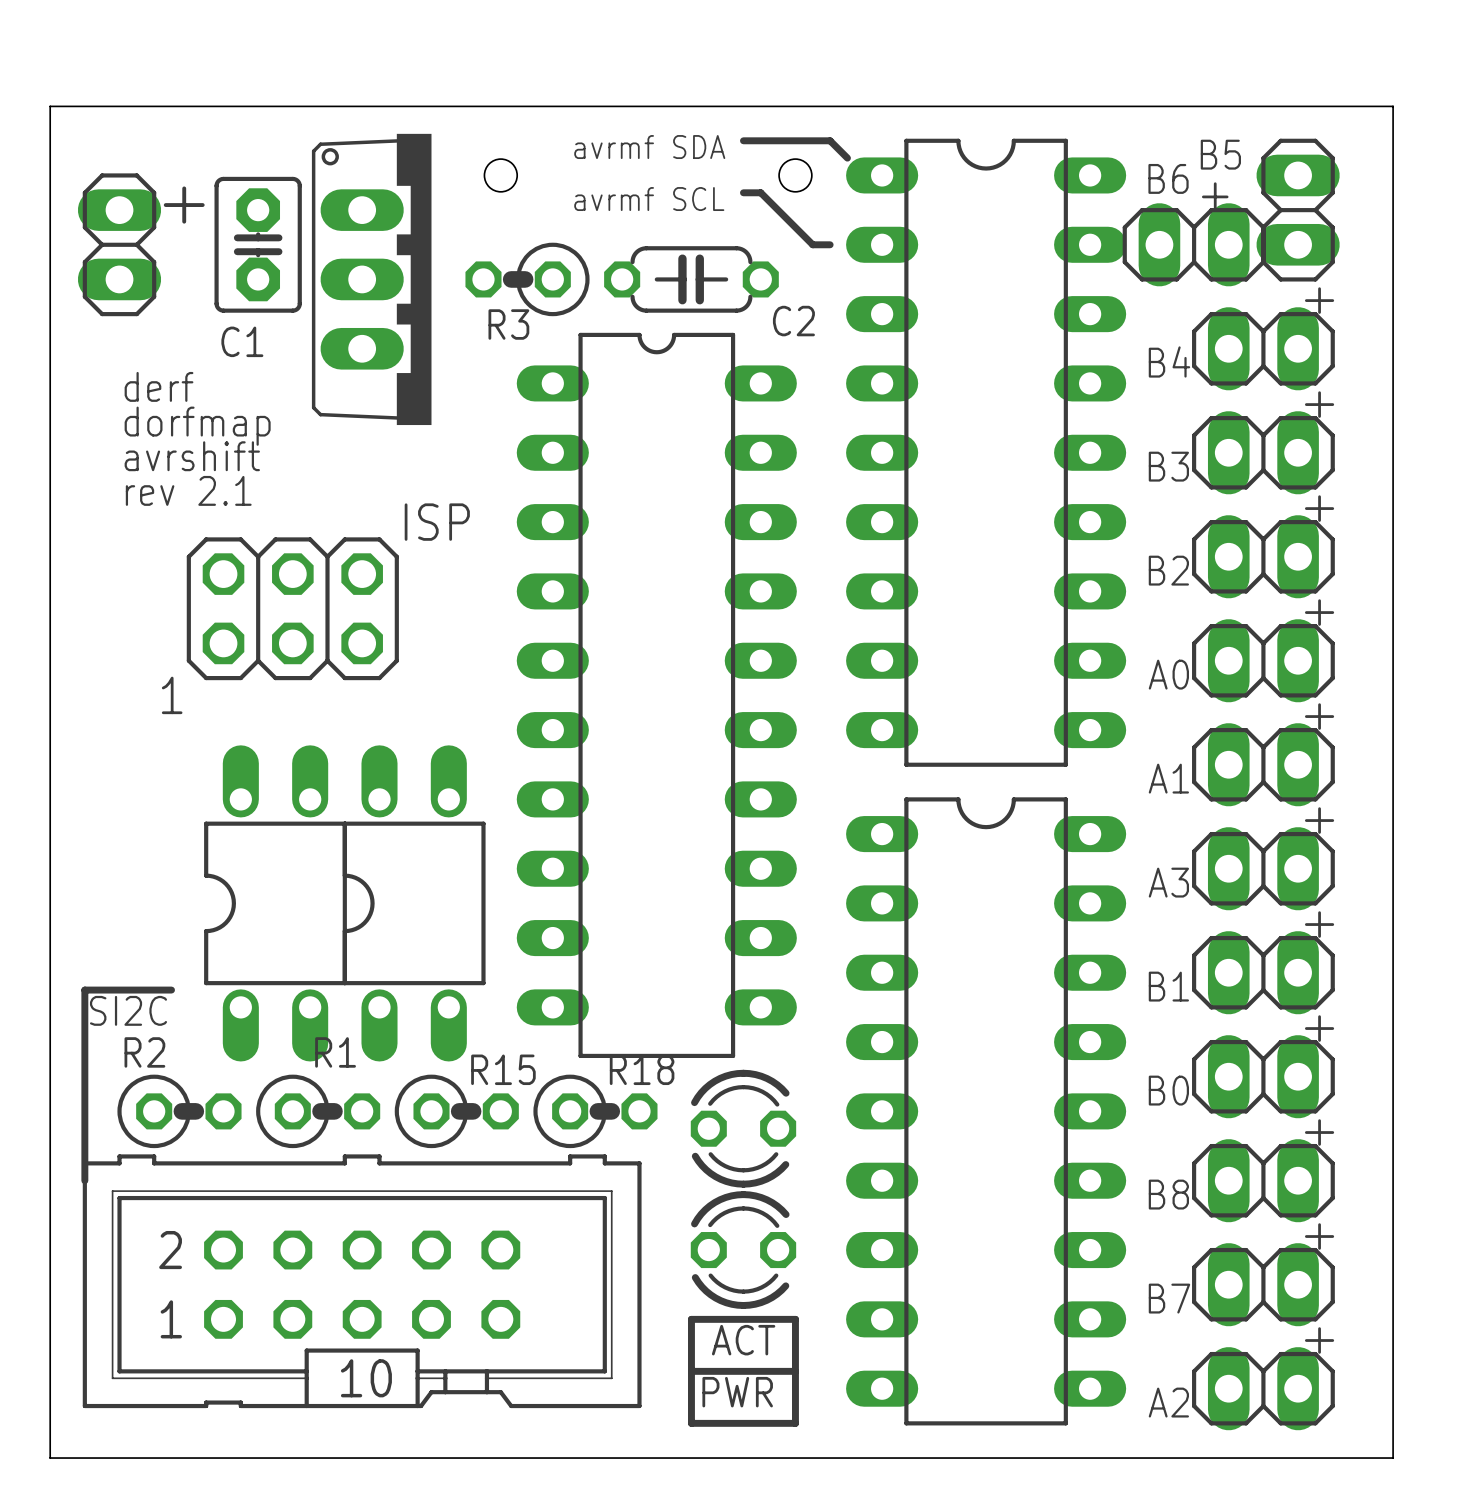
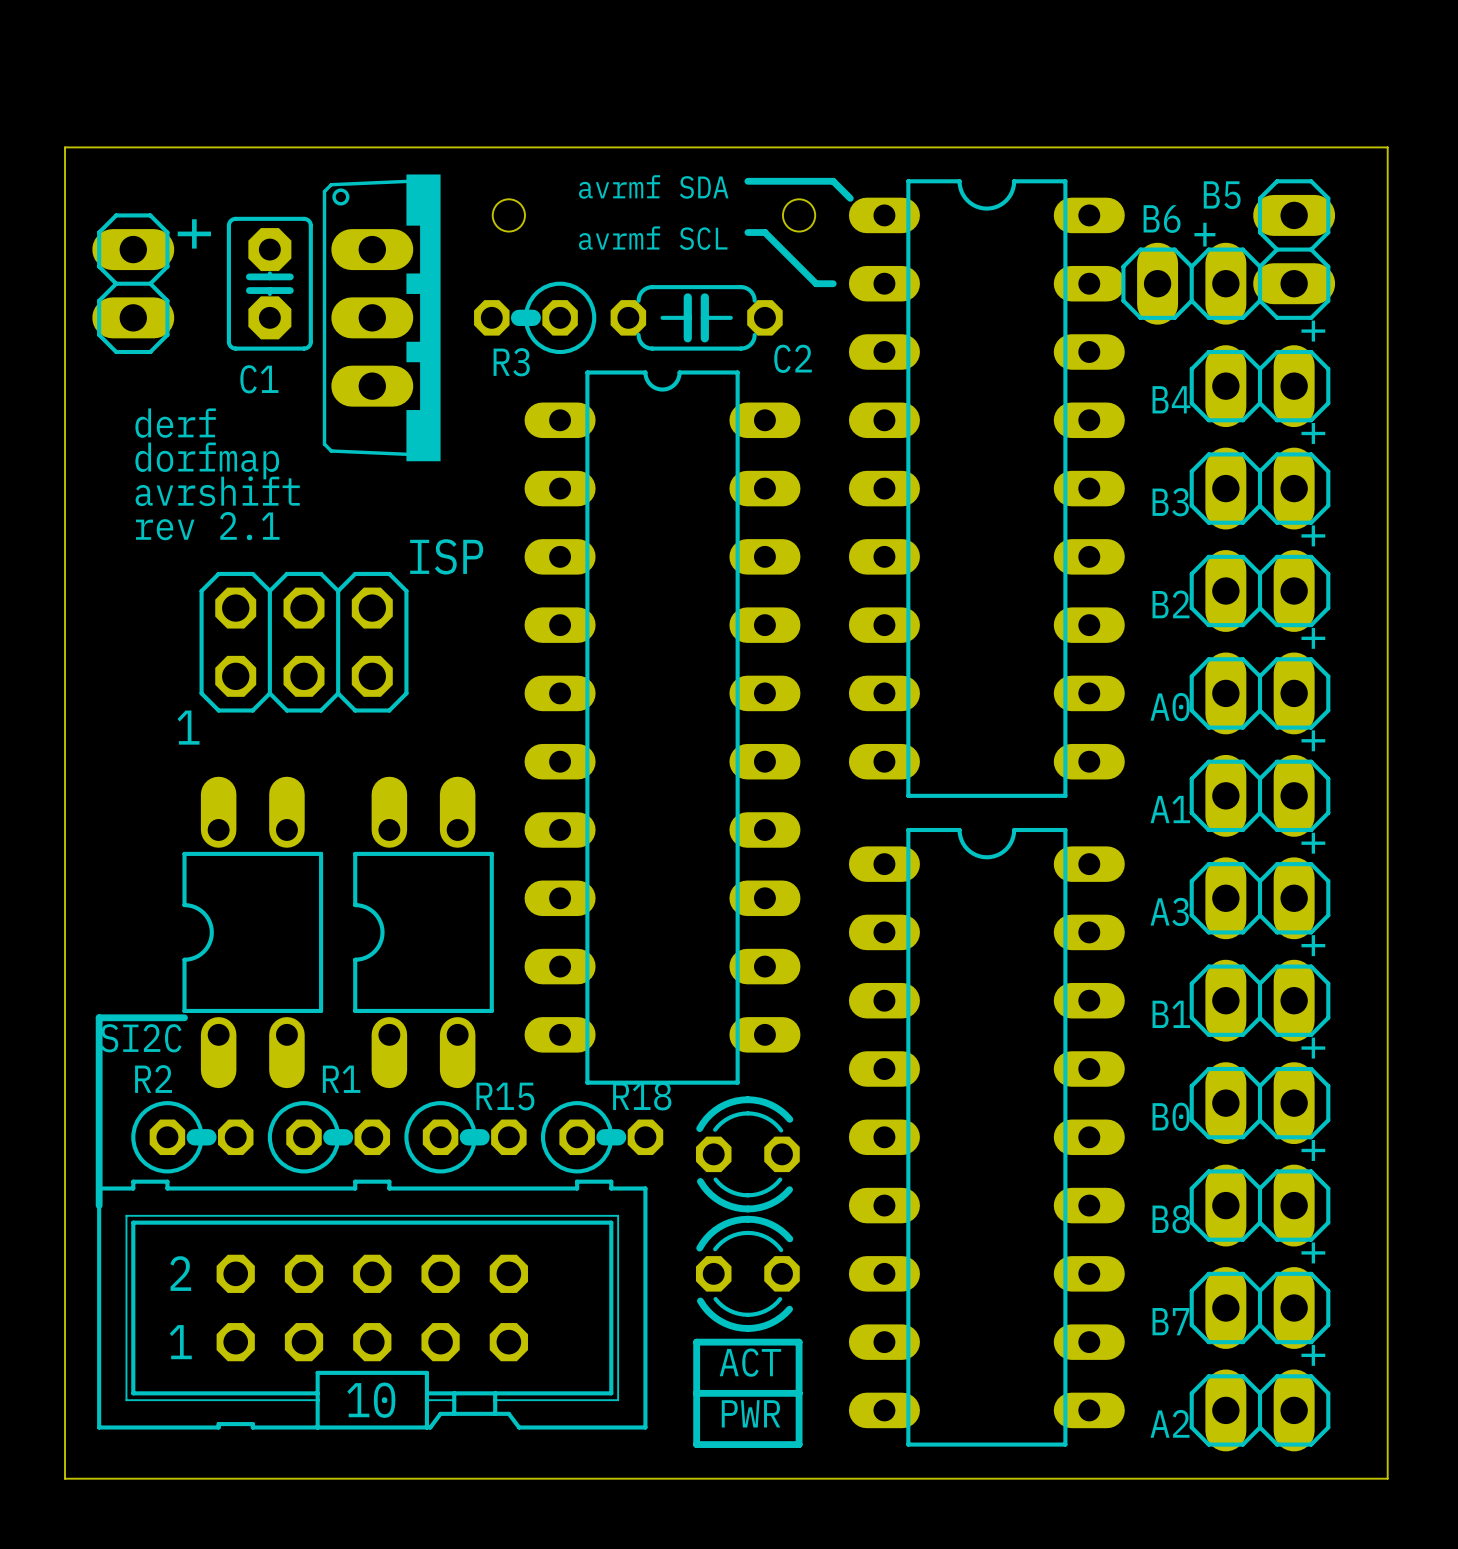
part position: (275, 903) -> (252, 932)

